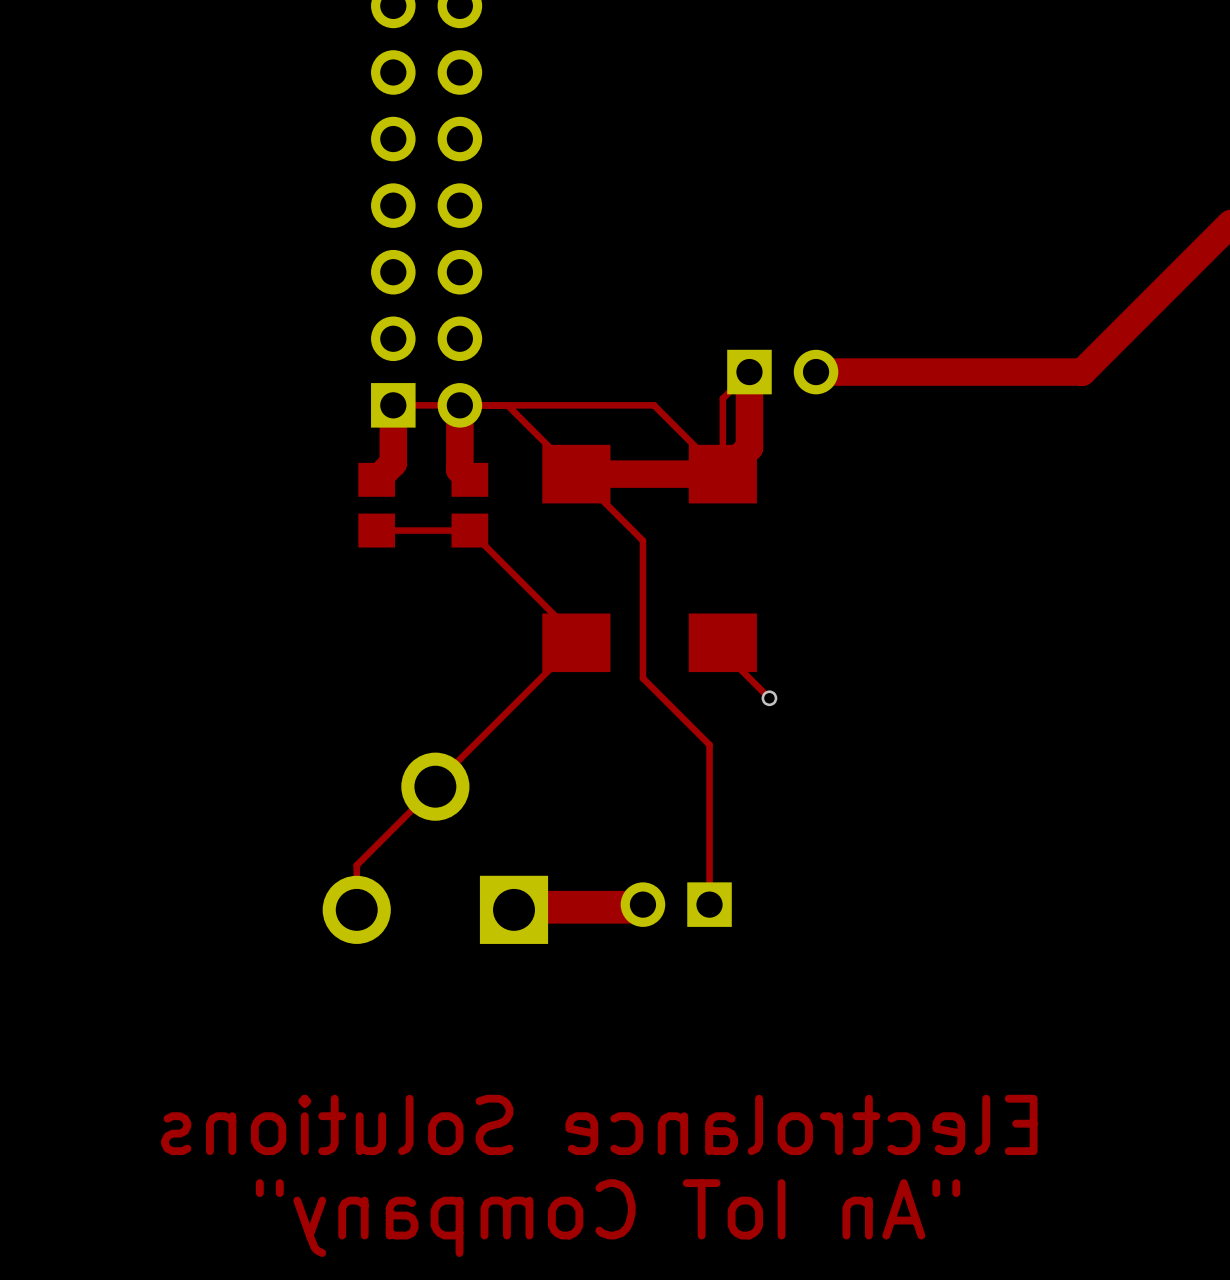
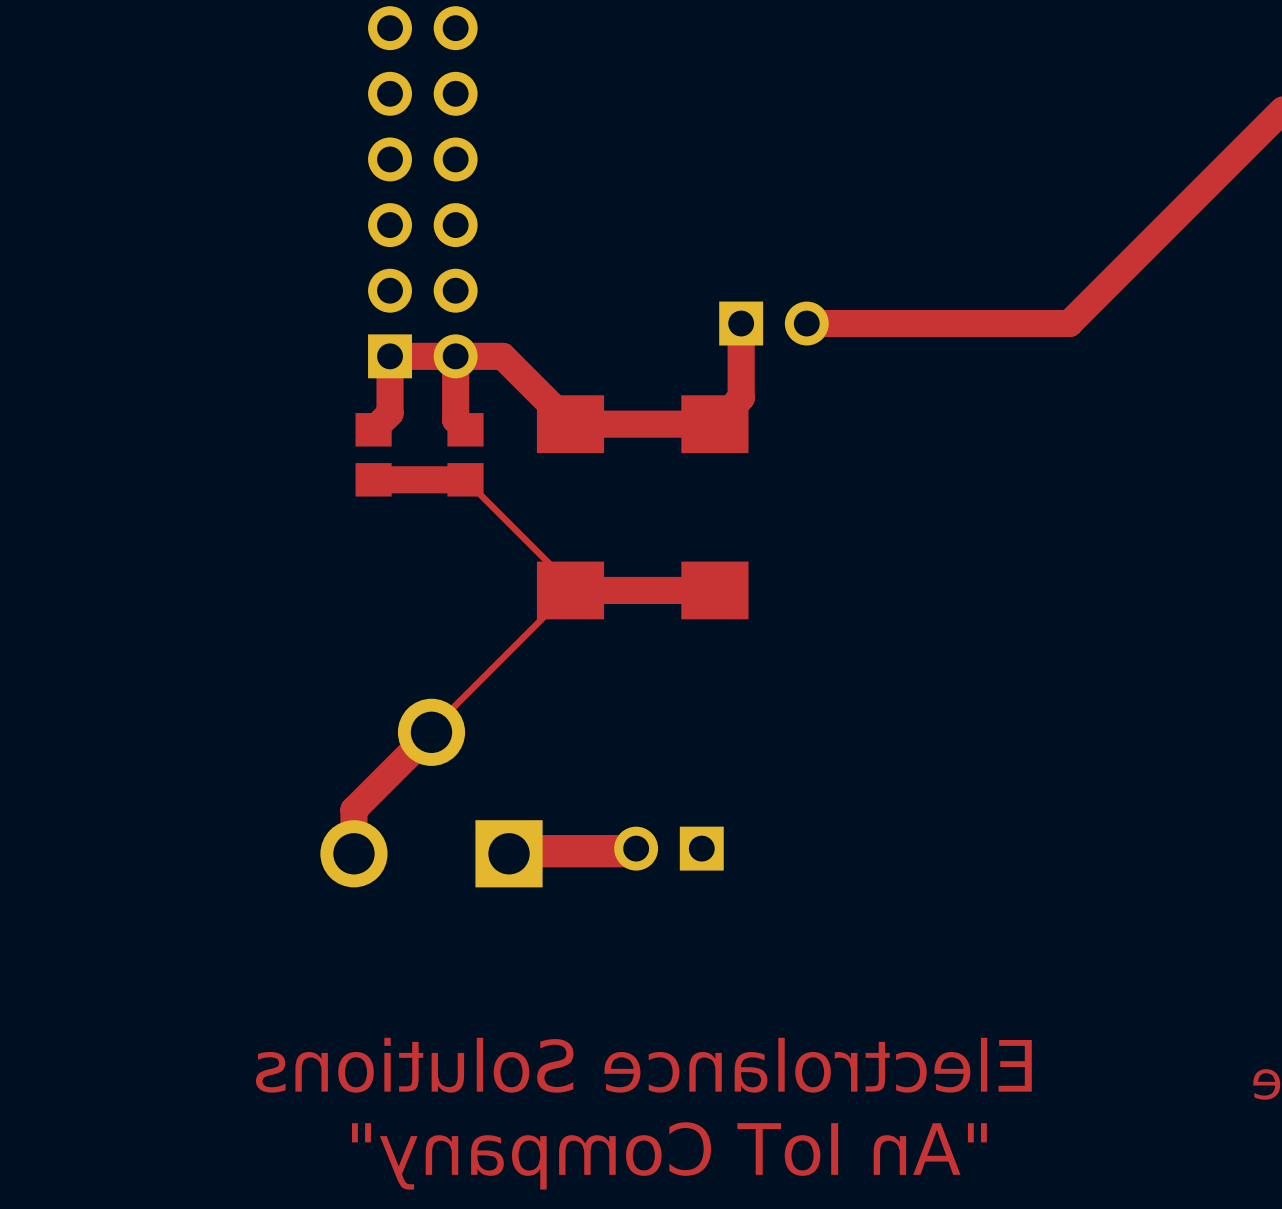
top track: (749, 372) (722, 398) (722, 474) (654, 405) (507, 405) -> none
top track width: thin (393, 405) (507, 405) (576, 474) -> thick (390, 356) (502, 356) (570, 424)
top track: (576, 474) (642, 540) (642, 678) (709, 744) (709, 904) -> none
top track width: thin (469, 530) (376, 530) -> thick (465, 479) (373, 479)
top track: none -> (714, 590) (570, 590)
top track: (722, 651) (769, 698) -> none
via: (769, 698) -> none
top track width: thin (435, 786) (356, 865) (356, 909) -> thick (431, 732) (353, 809) (353, 853)

